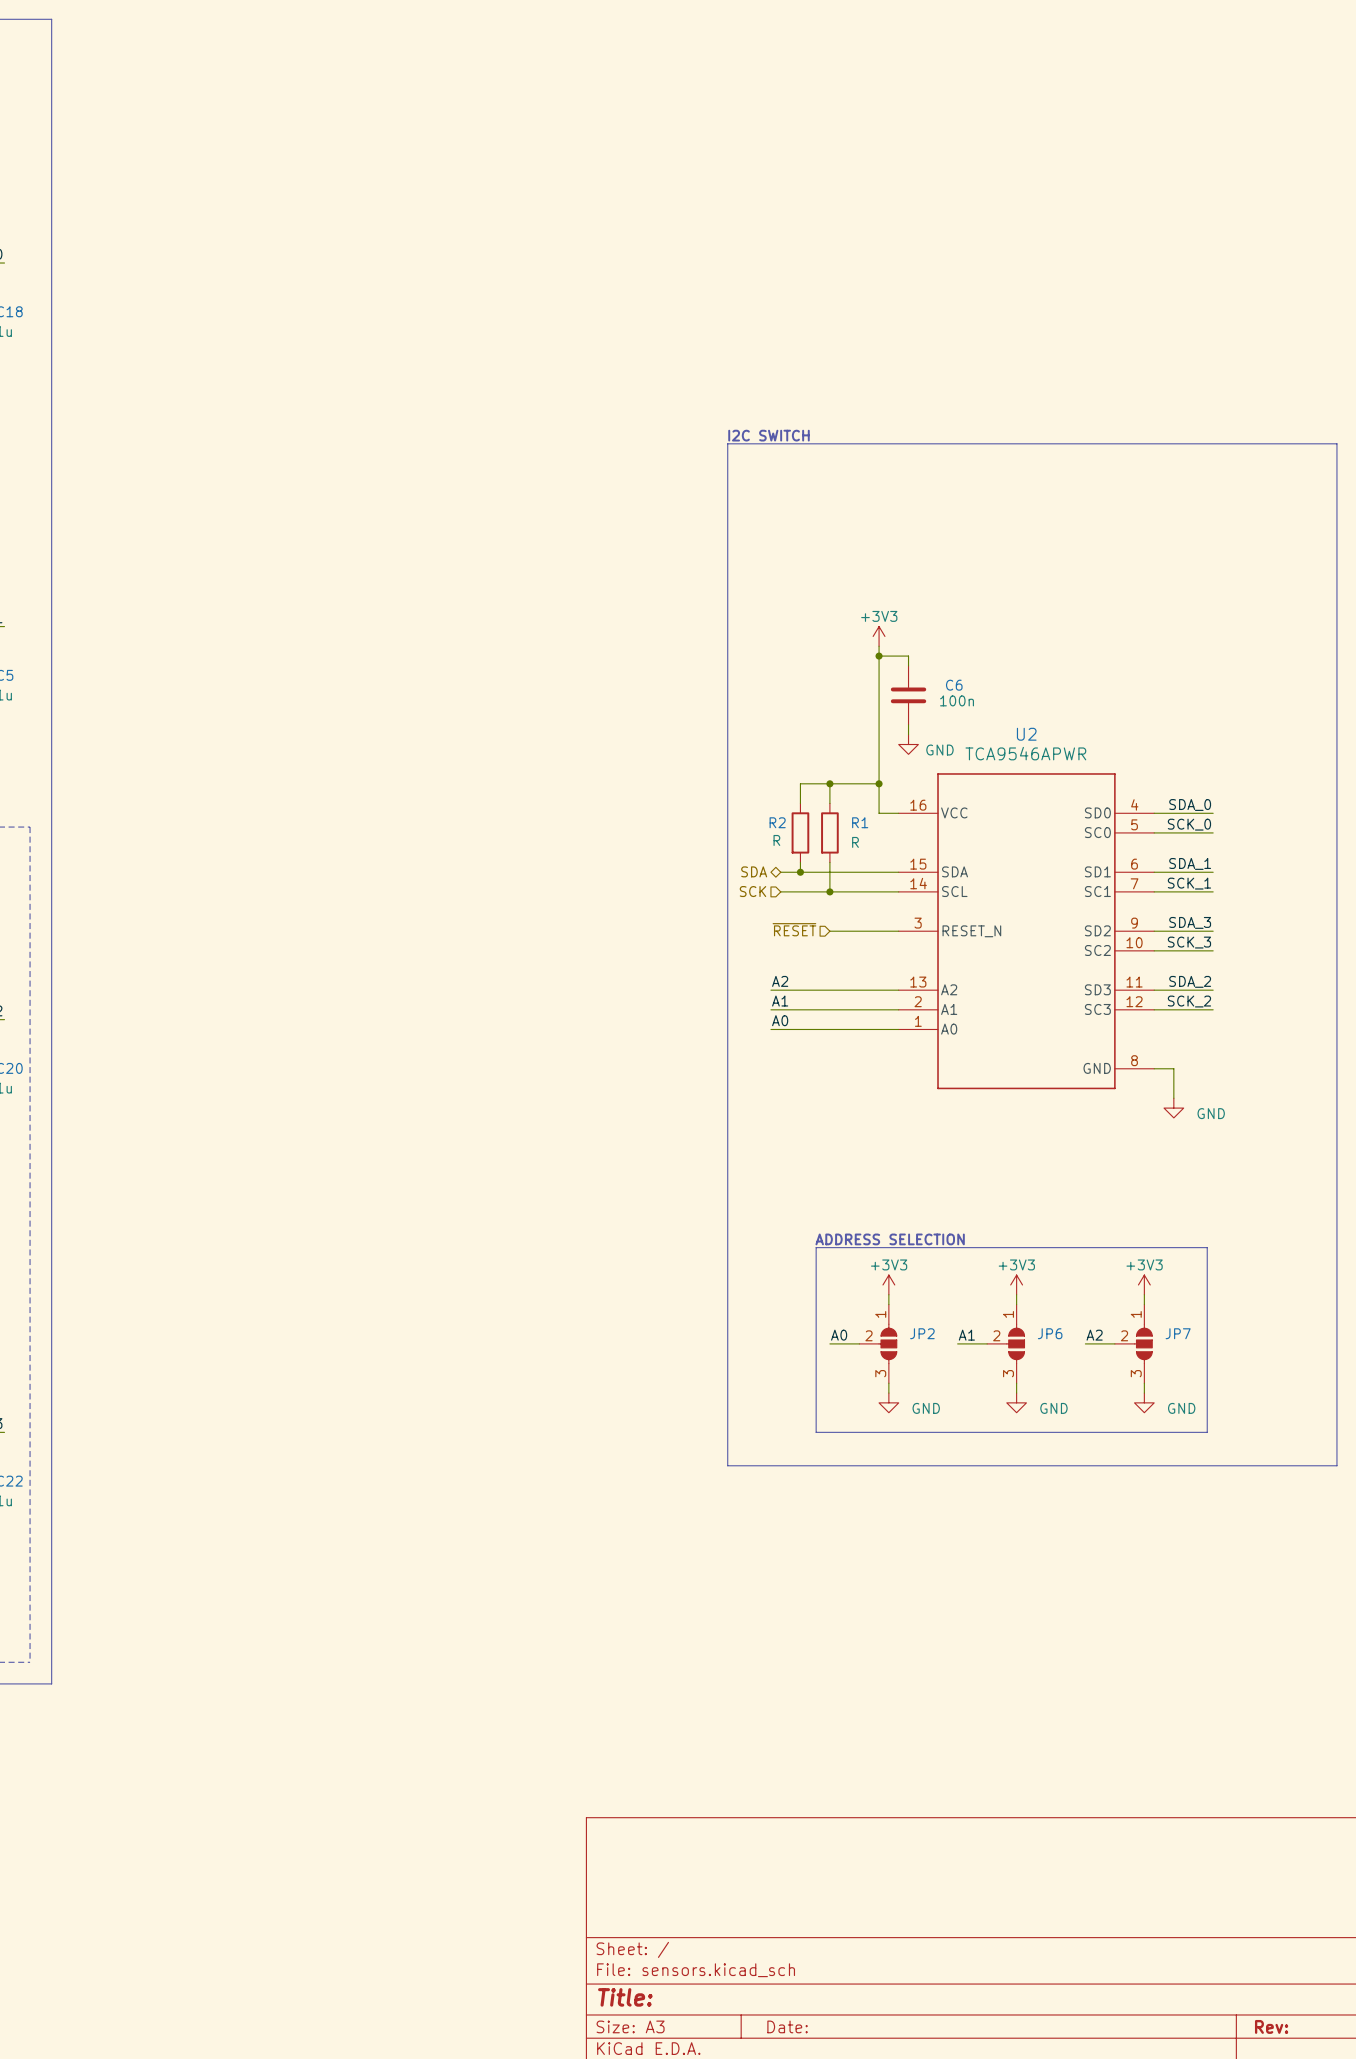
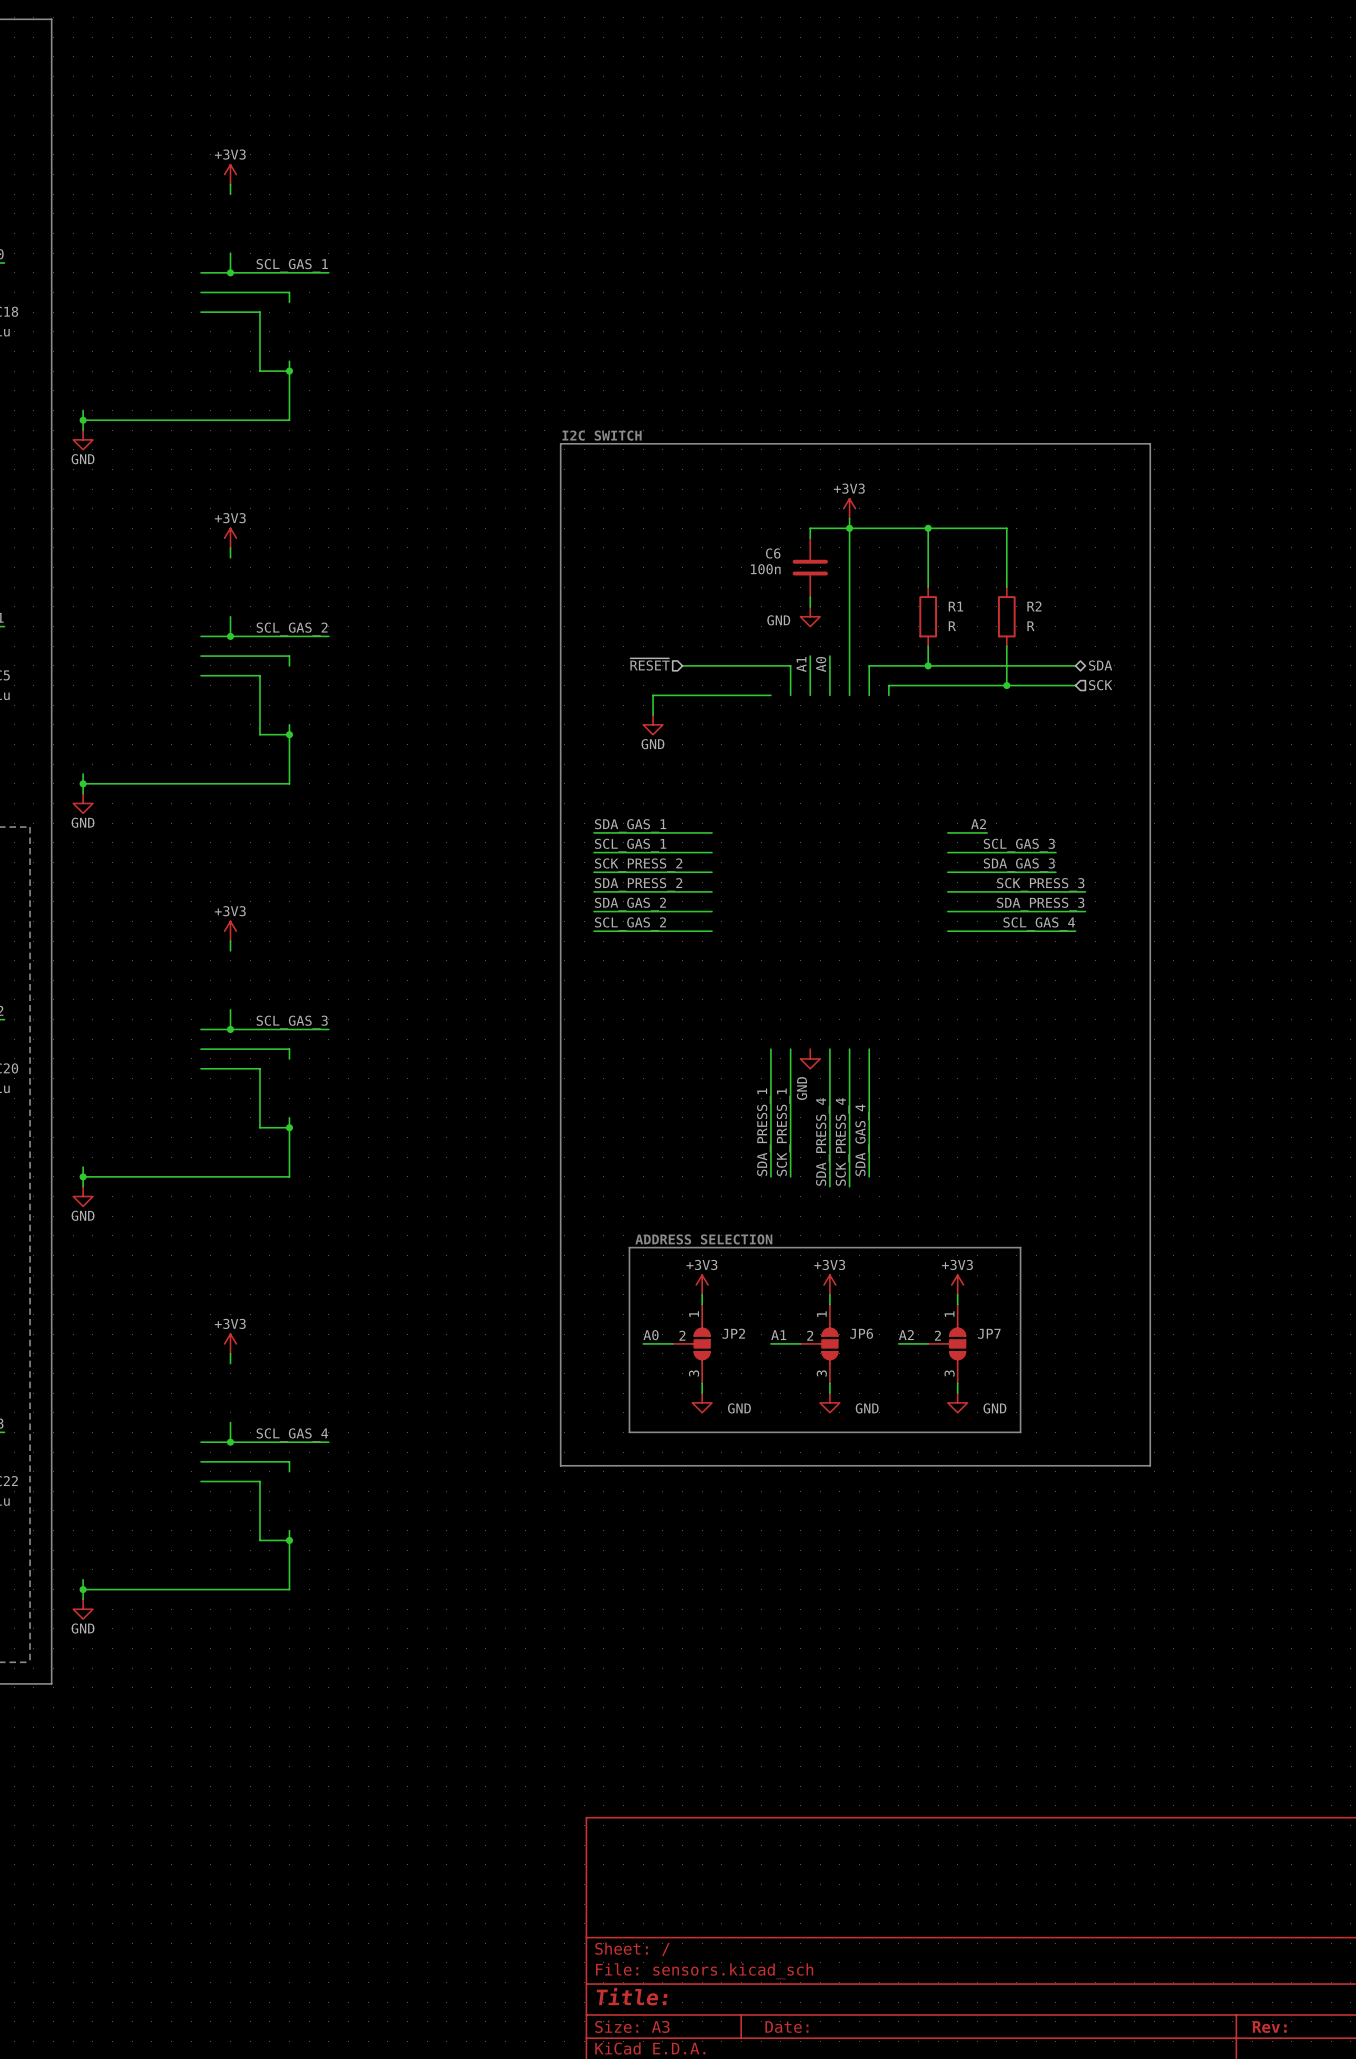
power symbol: none -> +3V3 (230, 174)
wire: none -> (230, 184) (230, 194)
wire: none -> (230, 253) (230, 272)
label: none -> SCL_GAS_1 (292, 265)
wire: none -> (201, 272) (328, 272)
junction: none -> (230, 272)
wire: none -> (201, 292) (289, 292) (289, 302)
wire: none -> (201, 312) (259, 312) (259, 371) (289, 371)
wire: none -> (289, 361) (289, 420) (83, 420)
junction: none -> (289, 371)
wire: none -> (83, 410) (83, 430)
junction: none -> (83, 420)
text position: I2C SWITCH (768, 435) -> I2C SWITCH (602, 435)
power symbol: none -> GND (83, 439)
line: (727, 443) (727, 1465) -> (727, 443) (560, 443) (560, 1465) (727, 1465)
line: (1150, 443) (1336, 443) (1336, 1465) (1150, 1465) -> (1150, 443) (1150, 1465)
wire: none -> (849, 518) (849, 695)
junction: none -> (849, 528)
wire: none -> (928, 528) (928, 587)
junction: none -> (928, 528)
power symbol: none -> +3V3 (230, 538)
wire: none -> (810, 538) (810, 528) (1006, 528) (1006, 587)
wire: none -> (230, 547) (230, 557)
wire: none -> (230, 616) (230, 636)
power symbol: none -> GND (810, 616)
label: none -> SCL_GAS_2 (292, 629)
wire: none -> (201, 636) (328, 636)
junction: none -> (230, 636)
power symbol position: +3V3 (879, 636) -> +3V3 (849, 508)
wire: (879, 646) (879, 813) (898, 813) -> none
wire: none -> (1006, 646) (1006, 685)
wire: none -> (201, 656) (289, 656) (289, 665)
wire: none -> (810, 656) (810, 695)
wire: none -> (829, 656) (829, 695)
wire: (879, 656) (908, 656) (908, 665) -> none
junction: (879, 656) -> none
hierarchical label: none -> ~{RESET} (650, 664)
wire: none -> (682, 665) (790, 665) (790, 695)
junction: none -> (928, 665)
wire: none -> (1075, 665) (869, 665) (869, 695)
hierarchical label: none -> SDA (1100, 665)
label: none -> A1 (801, 664)
label: none -> A0 (821, 664)
wire: none -> (201, 675) (259, 675) (259, 734) (289, 734)
C6 name position: C6 (954, 685) -> C6 (773, 553)
junction: none -> (1006, 685)
wire: none -> (1075, 685) (888, 685) (888, 695)
hierarchical label: none -> SCK (1100, 685)
wire: none -> (770, 695) (653, 695) (653, 715)
C6 position: (908, 695) -> (810, 567)
C6 value position: 100n (957, 700) -> 100n (765, 569)
wire: none -> (289, 724) (289, 783) (83, 783)
power symbol: none -> GND (653, 724)
wire: (908, 724) (908, 734) -> (810, 597) (810, 606)
junction: none -> (289, 734)
power symbol: GND (908, 744) -> none
wire: none -> (83, 773) (83, 793)
junction: none -> (83, 783)
wire: (829, 783) (829, 803) -> (928, 646) (928, 665)
junction: (829, 783) -> none
wire: (879, 783) (800, 783) (800, 803) -> none
junction: (879, 783) -> none
power symbol: none -> GND (83, 803)
label: SDA_0 (1190, 804) -> none
wire: (1154, 813) (1213, 813) -> none
R2 name position: R2 (777, 822) -> R2 (1034, 606)
label: none -> SDA_GAS_1 (630, 825)
label: none -> A2 (978, 824)
label: SCK_0 (1189, 824) -> none
wire: none -> (594, 832) (712, 832)
R2 position: (800, 832) -> (1006, 616)
R1 position: (829, 832) -> (928, 616)
wire: none -> (947, 832) (987, 832)
wire: (1154, 832) (1213, 832) -> none
R2 value position: R (776, 840) -> R (1030, 626)
label: none -> SCL_GAS_1 (630, 845)
label: none -> SCL_GAS_3 (1019, 845)
wire: none -> (594, 852) (712, 852)
wire: none -> (947, 852) (1055, 852)
wire: (800, 862) (800, 872) -> none
wire: (829, 862) (829, 891) -> none
label: none -> SCK_PRESS_2 (638, 864)
label: none -> SDA_GAS_3 (1019, 864)
label: SDA_1 (1190, 863) -> none
hierarchical label: SDA (754, 871) -> none
wire: (780, 872) (898, 872) -> (594, 872) (712, 872)
junction: (800, 872) -> none
wire: none -> (947, 872) (1055, 872)
wire: (1154, 872) (1213, 872) -> none
label: none -> SDA_PRESS_2 (638, 884)
label: none -> SCK_PRESS_3 (1040, 884)
label: SCK_1 (1189, 883) -> none
hierarchical label: SCK (752, 891) -> none
wire: (780, 891) (898, 891) -> (594, 891) (712, 891)
junction: (829, 891) -> none
wire: none -> (947, 891) (1085, 891)
wire: (1154, 891) (1213, 891) -> none
label: none -> SDA_GAS_2 (630, 904)
label: none -> SDA_PRESS_3 (1040, 904)
wire: none -> (594, 911) (712, 911)
wire: none -> (947, 911) (1085, 911)
label: none -> SCL_GAS_2 (630, 923)
label: none -> SCL_GAS_4 (1039, 923)
label: SDA_3 (1190, 922) -> none
hierarchical label: ~{RESET} (794, 929) -> none
power symbol: none -> +3V3 (230, 931)
wire: none -> (594, 931) (712, 931)
wire: (829, 931) (898, 931) -> none
U2: TCA9546APWR (1026, 931) -> none
wire: (1154, 931) (1213, 931) -> none
wire: none -> (230, 941) (230, 950)
label: SCK_3 (1189, 942) -> none
wire: (1154, 950) (1213, 950) -> none
label: A2 (780, 981) -> none
label: SDA_2 (1190, 981) -> none
wire: (770, 990) (898, 990) -> (947, 931) (1075, 931)
wire: (1154, 990) (1213, 990) -> none
label: A1 (780, 1001) -> none
label: SCK_2 (1189, 1001) -> none
wire: none -> (230, 1009) (230, 1029)
wire: (770, 1009) (898, 1009) -> none
wire: (1154, 1009) (1213, 1009) -> none
label: A0 (780, 1020) -> none
label: none -> SCL_GAS_3 (292, 1022)
wire: none -> (201, 1029) (328, 1029)
junction: none -> (230, 1029)
wire: (770, 1029) (898, 1029) -> none
wire: none -> (201, 1049) (289, 1049) (289, 1058)
wire: none -> (770, 1049) (770, 1176)
wire: none -> (790, 1049) (790, 1176)
wire: none -> (829, 1049) (829, 1186)
wire: none -> (849, 1049) (849, 1186)
wire: none -> (869, 1049) (869, 1176)
power symbol: none -> GND (810, 1058)
wire: none -> (201, 1068) (259, 1068) (259, 1127) (289, 1127)
wire: (1154, 1068) (1173, 1068) (1173, 1098) -> none
power symbol: GND (1173, 1108) -> none
wire: none -> (289, 1117) (289, 1176) (83, 1176)
label: none -> SCK_PRESS_1 (783, 1132)
label: none -> SDA_PRESS_1 (763, 1132)
junction: none -> (289, 1127)
label: none -> SCK_PRESS_4 (842, 1141)
label: none -> SDA_PRESS_4 (822, 1141)
label: none -> SDA_GAS_4 (861, 1140)
wire: none -> (83, 1167) (83, 1186)
junction: none -> (83, 1176)
power symbol: none -> GND (83, 1196)
text position: ADDRESS SELECTION (890, 1239) -> ADDRESS SELECTION (703, 1239)
line: (816, 1247) (816, 1432) -> (816, 1247) (629, 1247) (629, 1432) (816, 1432)
line: (1020, 1247) (1207, 1247) (1207, 1432) (1020, 1432) -> (1020, 1247) (1020, 1432)
power symbol: none -> +3V3 (702, 1284)
power symbol: none -> +3V3 (829, 1284)
power symbol: +3V3 (888, 1284) -> none
power symbol: none -> +3V3 (957, 1284)
power symbol: +3V3 (1016, 1284) -> none
power symbol: +3V3 (1144, 1284) -> none
wire: (888, 1294) (888, 1304) -> (702, 1294) (702, 1304)
wire: (1016, 1294) (1016, 1304) -> (829, 1294) (829, 1304)
wire: (1144, 1294) (1144, 1304) -> (957, 1294) (957, 1304)
label: none -> A0 (651, 1335)
label: none -> A1 (778, 1335)
label: A0 (839, 1335) -> none
label: A1 (966, 1335) -> none
label position: A2 (1094, 1335) -> A2 (906, 1335)
power symbol: none -> +3V3 (230, 1343)
wire: (829, 1343) (859, 1343) -> (643, 1343) (672, 1343)
JP2 position: (878, 1343) -> (691, 1343)
wire: (957, 1343) (987, 1343) -> (770, 1343) (800, 1343)
JP6 position: (1005, 1343) -> (819, 1343)
wire: (1085, 1343) (1114, 1343) -> (898, 1343) (928, 1343)
JP7 position: (1133, 1343) -> (946, 1343)
wire: none -> (230, 1353) (230, 1363)
wire: (888, 1383) (888, 1393) -> (702, 1383) (702, 1393)
wire: (1016, 1383) (1016, 1393) -> (829, 1383) (829, 1393)
wire: (1144, 1383) (1144, 1393) -> (957, 1383) (957, 1393)
power symbol: none -> GND (702, 1402)
power symbol: none -> GND (829, 1402)
power symbol: GND (888, 1402) -> none
power symbol: none -> GND (957, 1402)
power symbol: GND (1016, 1402) -> none
power symbol: GND (1144, 1402) -> none
wire: none -> (230, 1422) (230, 1442)
label: none -> SCL_GAS_4 (292, 1434)
wire: none -> (201, 1442) (328, 1442)
junction: none -> (230, 1442)
wire: none -> (201, 1461) (289, 1461) (289, 1471)
wire: none -> (201, 1481) (259, 1481) (259, 1540) (289, 1540)
wire: none -> (289, 1530) (289, 1589) (83, 1589)
junction: none -> (289, 1540)
wire: none -> (83, 1579) (83, 1599)
junction: none -> (83, 1589)
power symbol: none -> GND (83, 1609)

